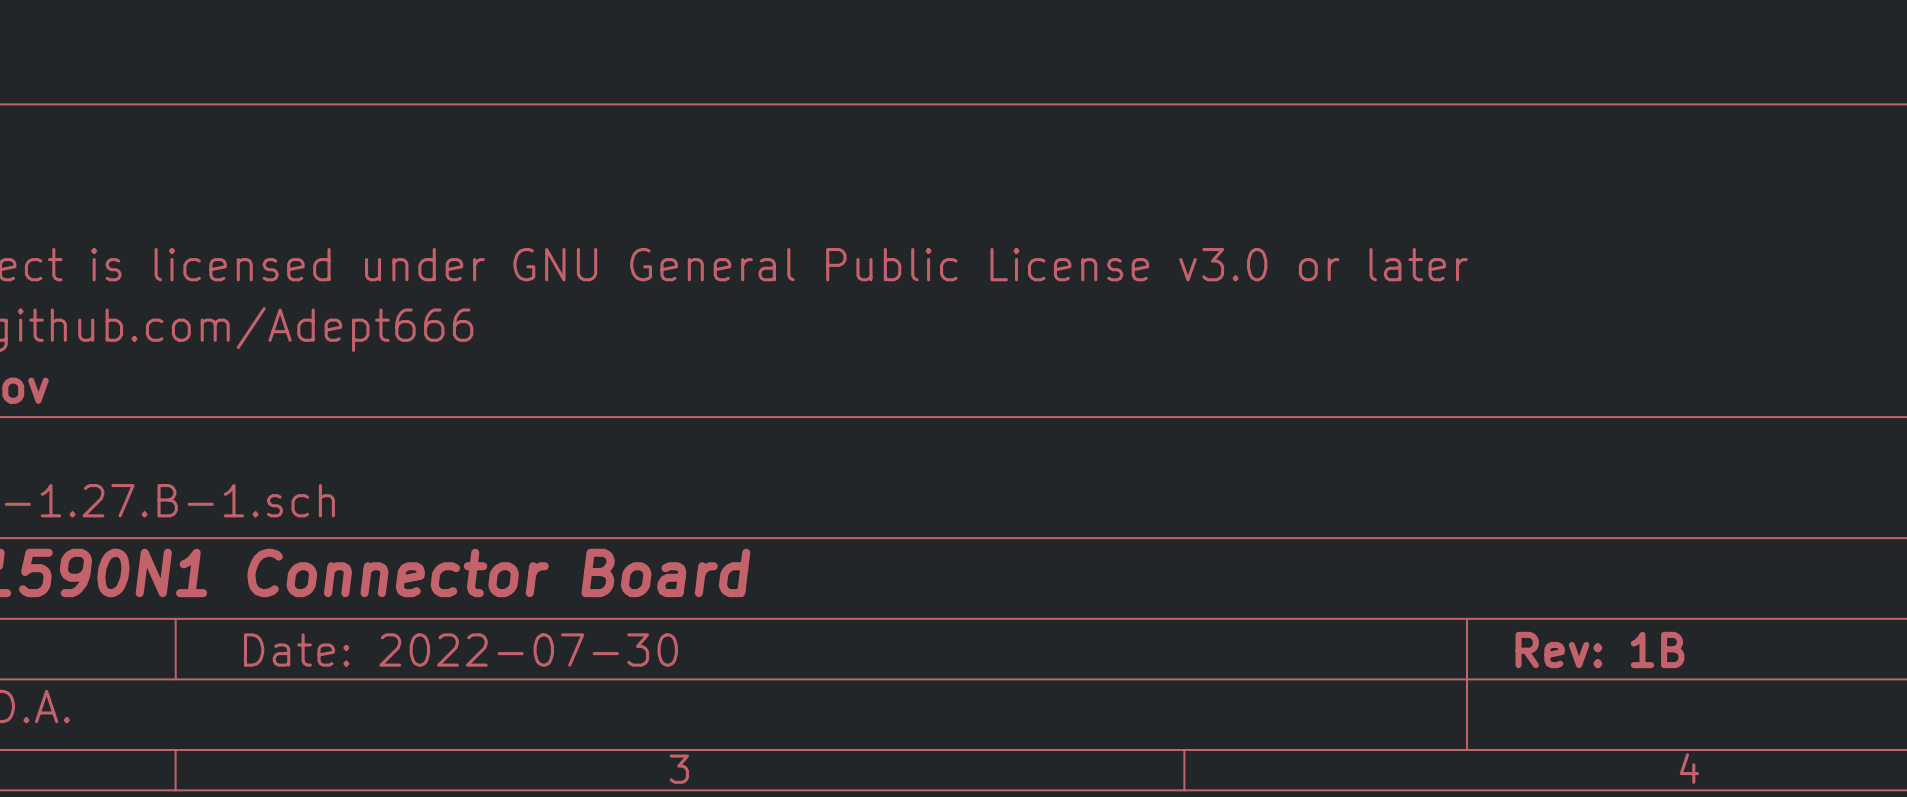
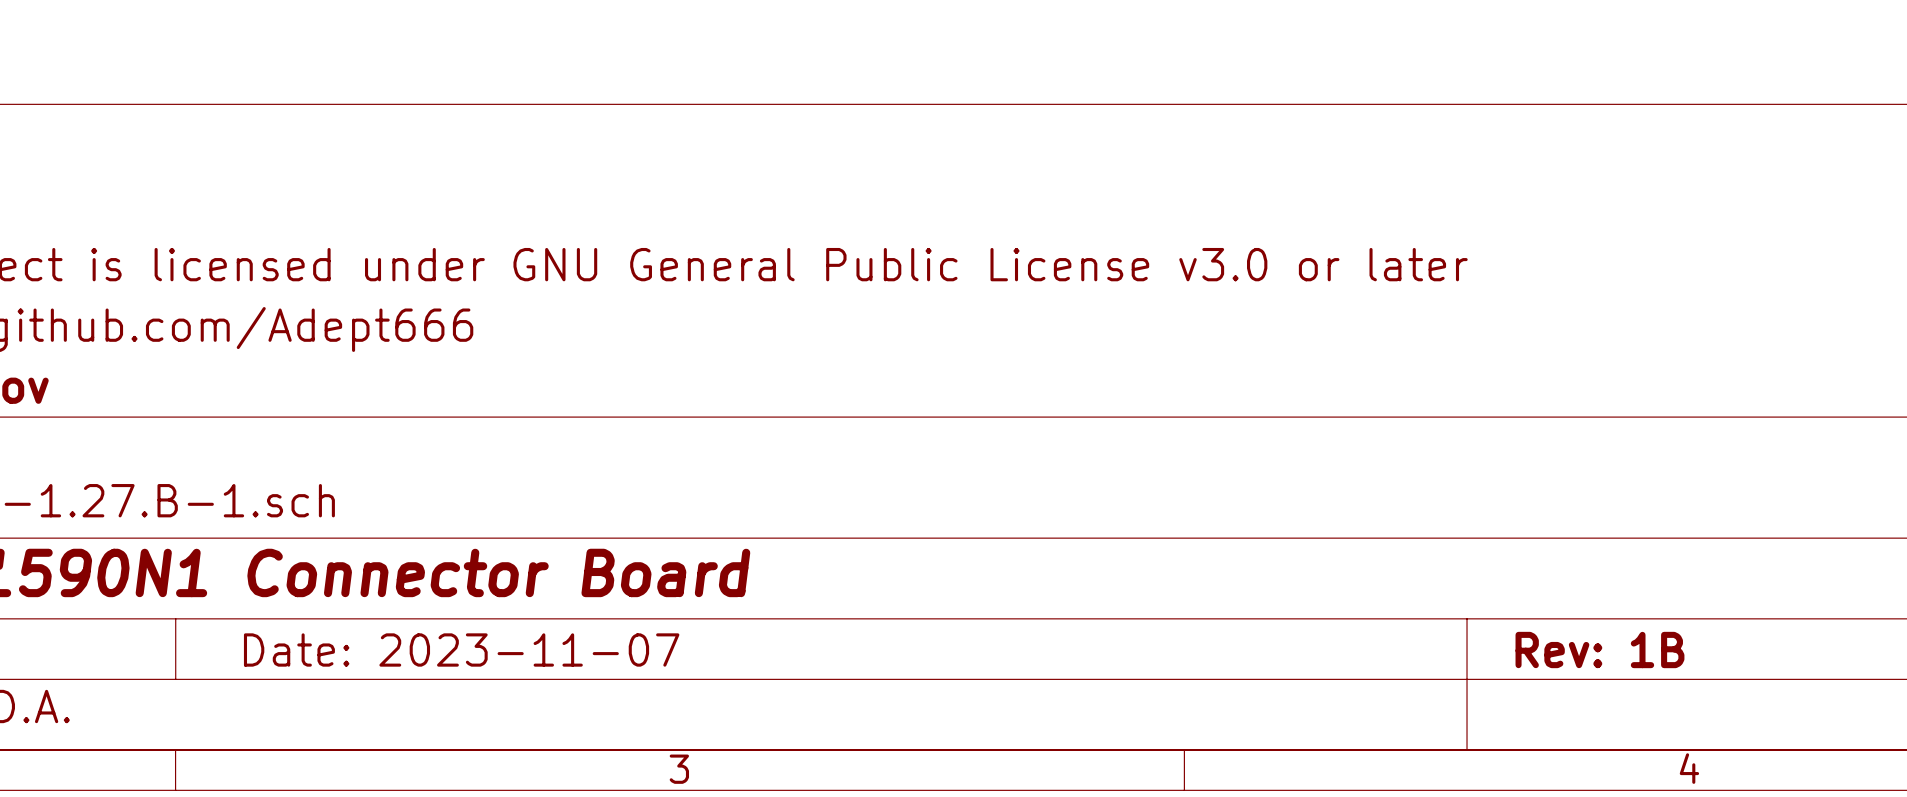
title block: Date: 2022-07-30 (460, 650) -> Date: 2023-11-07 (461, 650)

